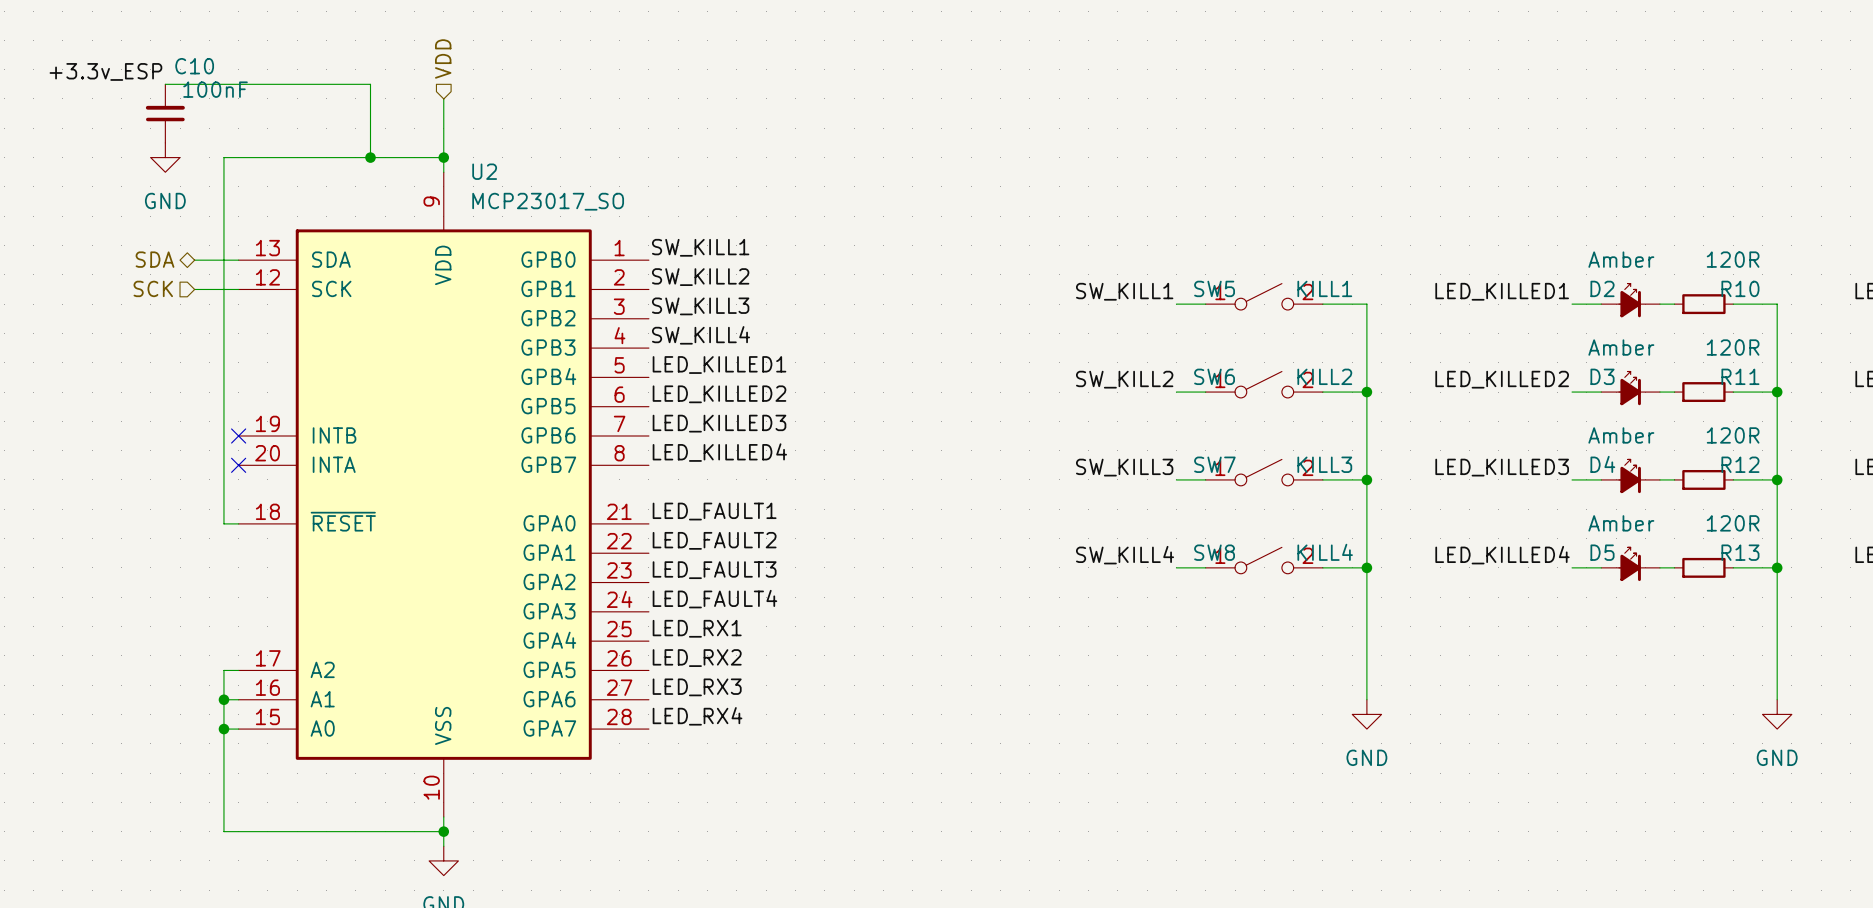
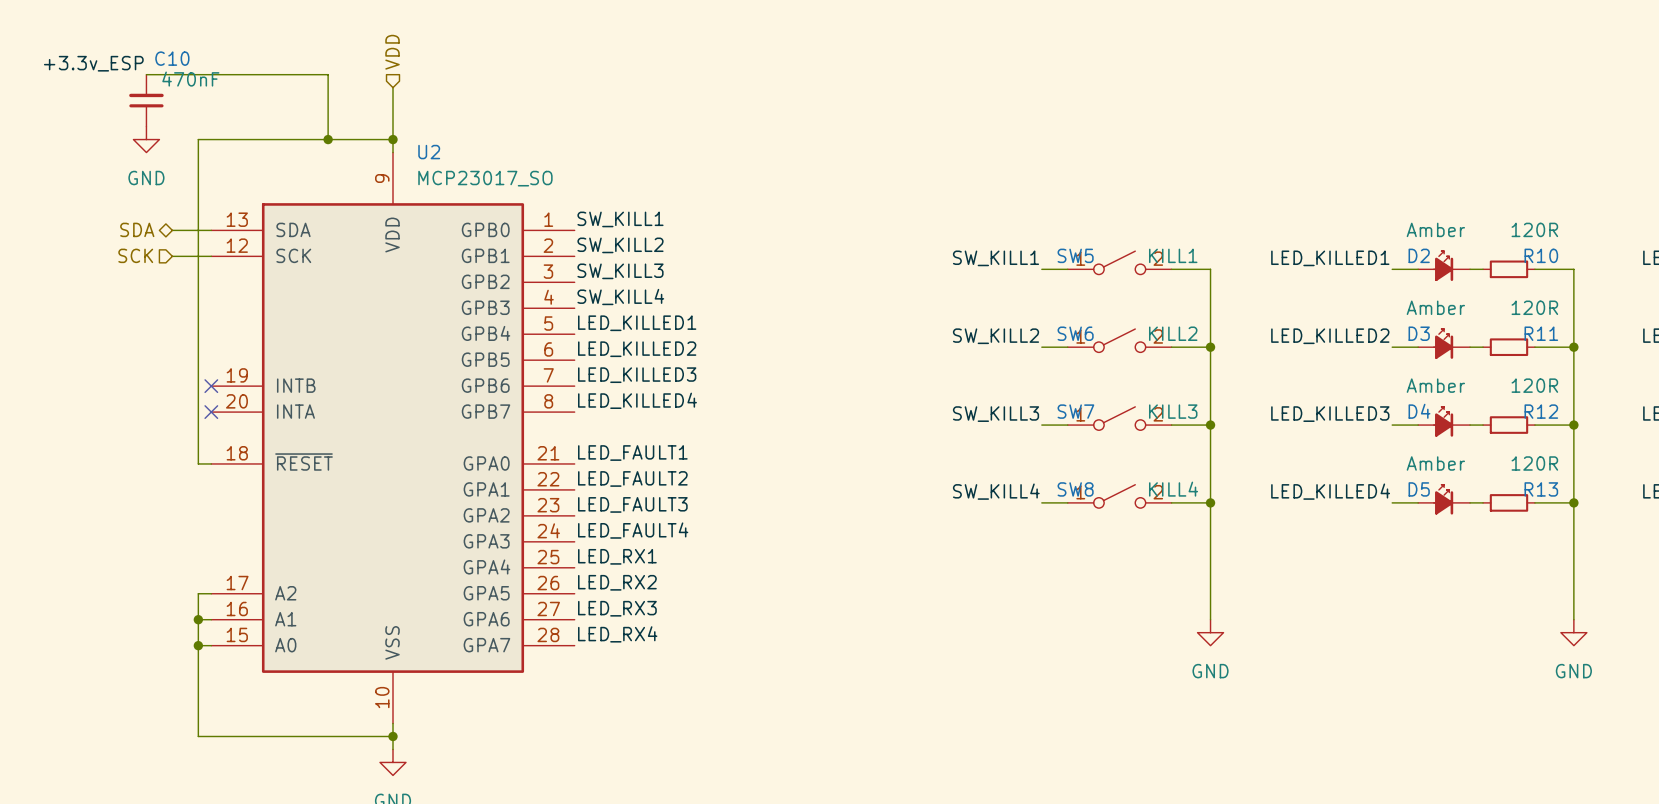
C10 value: 100nF (215, 89) -> 470nF (190, 79)

